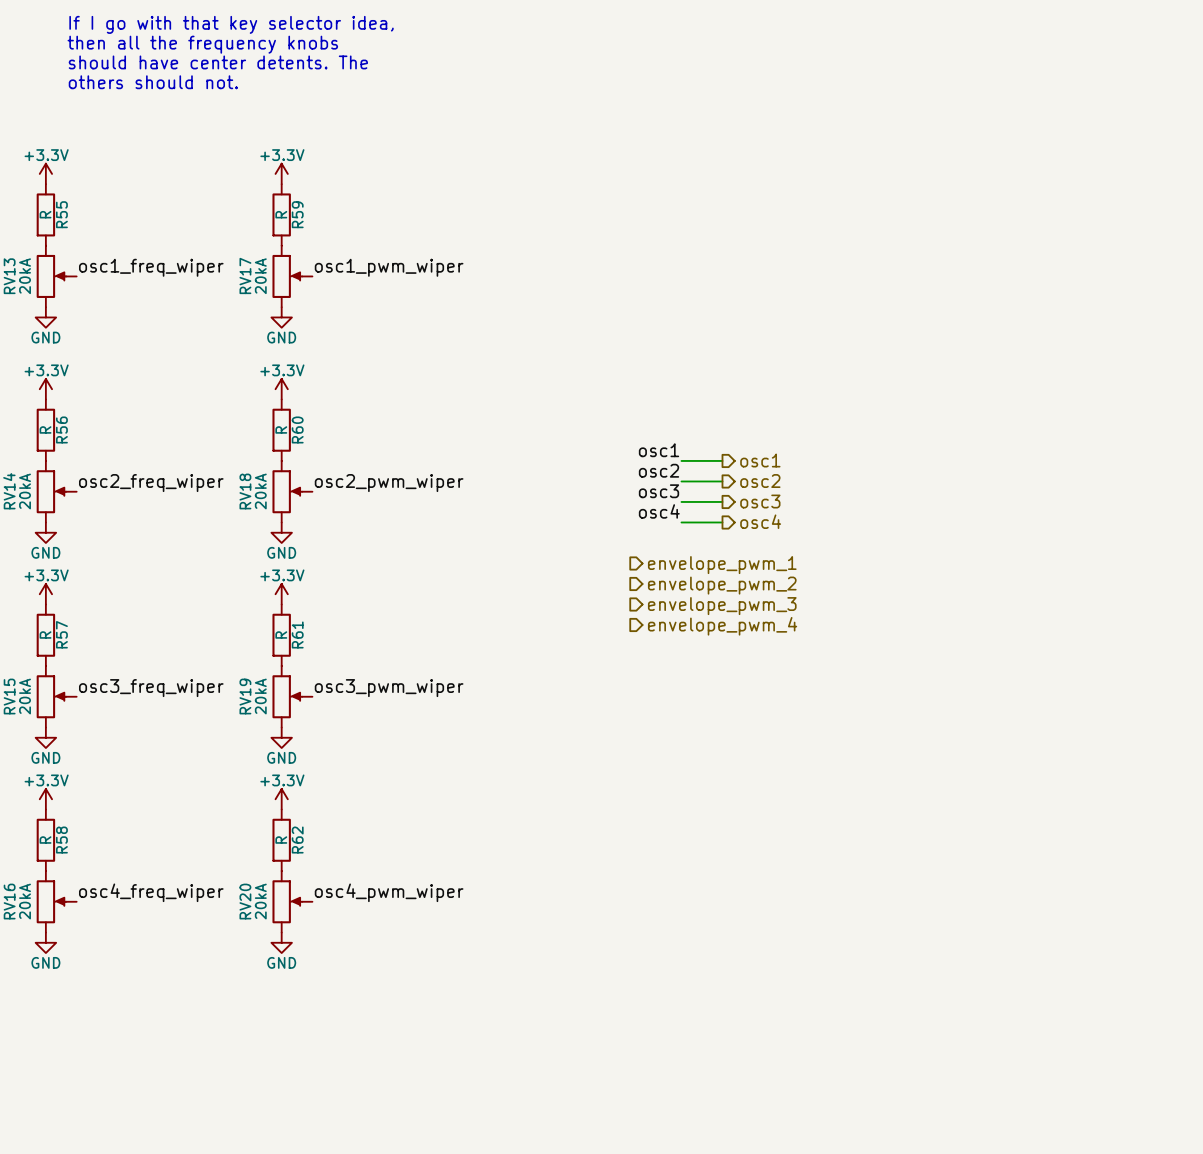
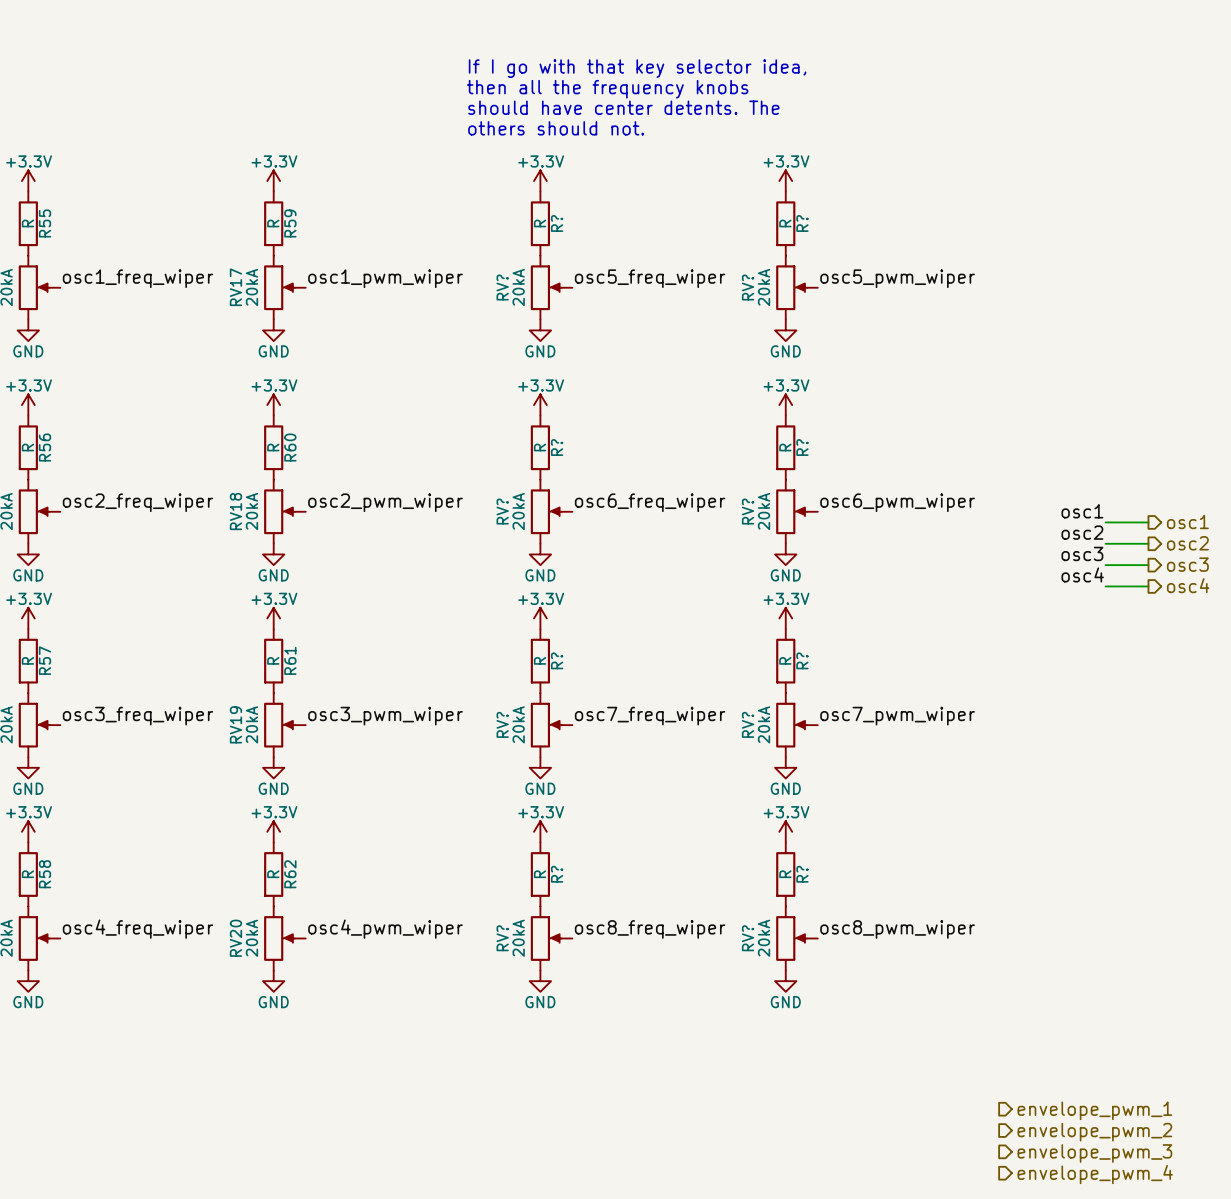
text: If I go with that key selector idea, (231, 24) -> none
text: then all the frequency knobs (202, 44) -> none
text: should have center detents. The (218, 62) -> none
text: none -> If I go with that key selector idea, (637, 68)
text: others should not. (153, 82) -> none
text: none -> then all the frequency knobs (607, 89)
text: none -> should have center detents. The (623, 107)
text: none -> others should not. (556, 128)
power symbol: none -> +3.3V (540, 181)
power symbol: none -> +3.3V (785, 181)
R?: none -> R (540, 223)
R?: none -> R (785, 223)
label: none -> osc5_freq_wiper (650, 278)
label: none -> osc5_pwm_wiper (897, 278)
RV?: none -> 20kA (551, 287)
RV?: none -> 20kA (796, 287)
power symbol: none -> GND (540, 330)
power symbol: none -> GND (785, 330)
power symbol: none -> +3.3V (540, 405)
power symbol: none -> +3.3V (785, 405)
R?: none -> R (540, 447)
R?: none -> R (785, 447)
label: osc1 (658, 450) -> none
wire: (681, 460) (722, 460) -> none
hierarchical label: osc1 (760, 460) -> none
label: osc2 (658, 470) -> none
wire: (681, 481) (722, 481) -> none
hierarchical label: osc2 (760, 481) -> none
label: none -> osc6_freq_wiper (650, 502)
label: none -> osc6_pwm_wiper (897, 502)
RV?: none -> 20kA (551, 511)
label: osc3 (658, 491) -> none
RV?: none -> 20kA (796, 511)
label: none -> osc1 (1082, 511)
wire: (681, 501) (722, 501) -> none
hierarchical label: osc3 (760, 501) -> none
wire: none -> (1105, 522) (1148, 522)
hierarchical label: none -> osc1 (1187, 521)
label: osc4 (659, 511) -> none
label: none -> osc2 (1082, 532)
hierarchical label: osc4 (760, 521) -> none
wire: (681, 522) (722, 522) -> none
wire: none -> (1105, 543) (1148, 543)
hierarchical label: none -> osc2 (1187, 543)
power symbol: none -> GND (540, 554)
power symbol: none -> GND (785, 554)
label: none -> osc3 (1082, 553)
wire: none -> (1105, 565) (1148, 565)
hierarchical label: none -> osc3 (1187, 564)
label: none -> osc4 (1082, 574)
hierarchical label: none -> osc4 (1188, 585)
wire: none -> (1105, 586) (1148, 586)
hierarchical label: envelope_pwm_1 (722, 565) -> none
hierarchical label: envelope_pwm_2 (722, 585) -> none
power symbol: none -> +3.3V (540, 618)
power symbol: none -> +3.3V (785, 618)
hierarchical label: envelope_pwm_3 (722, 606) -> none
hierarchical label: envelope_pwm_4 (722, 626) -> none
R?: none -> R (540, 661)
R?: none -> R (785, 661)
label: none -> osc7_freq_wiper (650, 716)
label: none -> osc7_pwm_wiper (897, 716)
RV?: none -> 20kA (551, 725)
RV?: none -> 20kA (796, 725)
power symbol: none -> GND (540, 767)
power symbol: none -> GND (785, 767)
power symbol: none -> +3.3V (540, 831)
power symbol: none -> +3.3V (785, 831)
R?: none -> R (540, 874)
R?: none -> R (785, 874)
label: none -> osc8_freq_wiper (650, 929)
label: none -> osc8_pwm_wiper (897, 929)
RV?: none -> 20kA (551, 938)
RV?: none -> 20kA (796, 938)
power symbol: none -> GND (540, 981)
power symbol: none -> GND (785, 981)
hierarchical label: none -> envelope_pwm_1 (1094, 1110)
hierarchical label: none -> envelope_pwm_2 (1094, 1132)
hierarchical label: none -> envelope_pwm_3 (1094, 1153)
hierarchical label: none -> envelope_pwm_4 (1095, 1174)

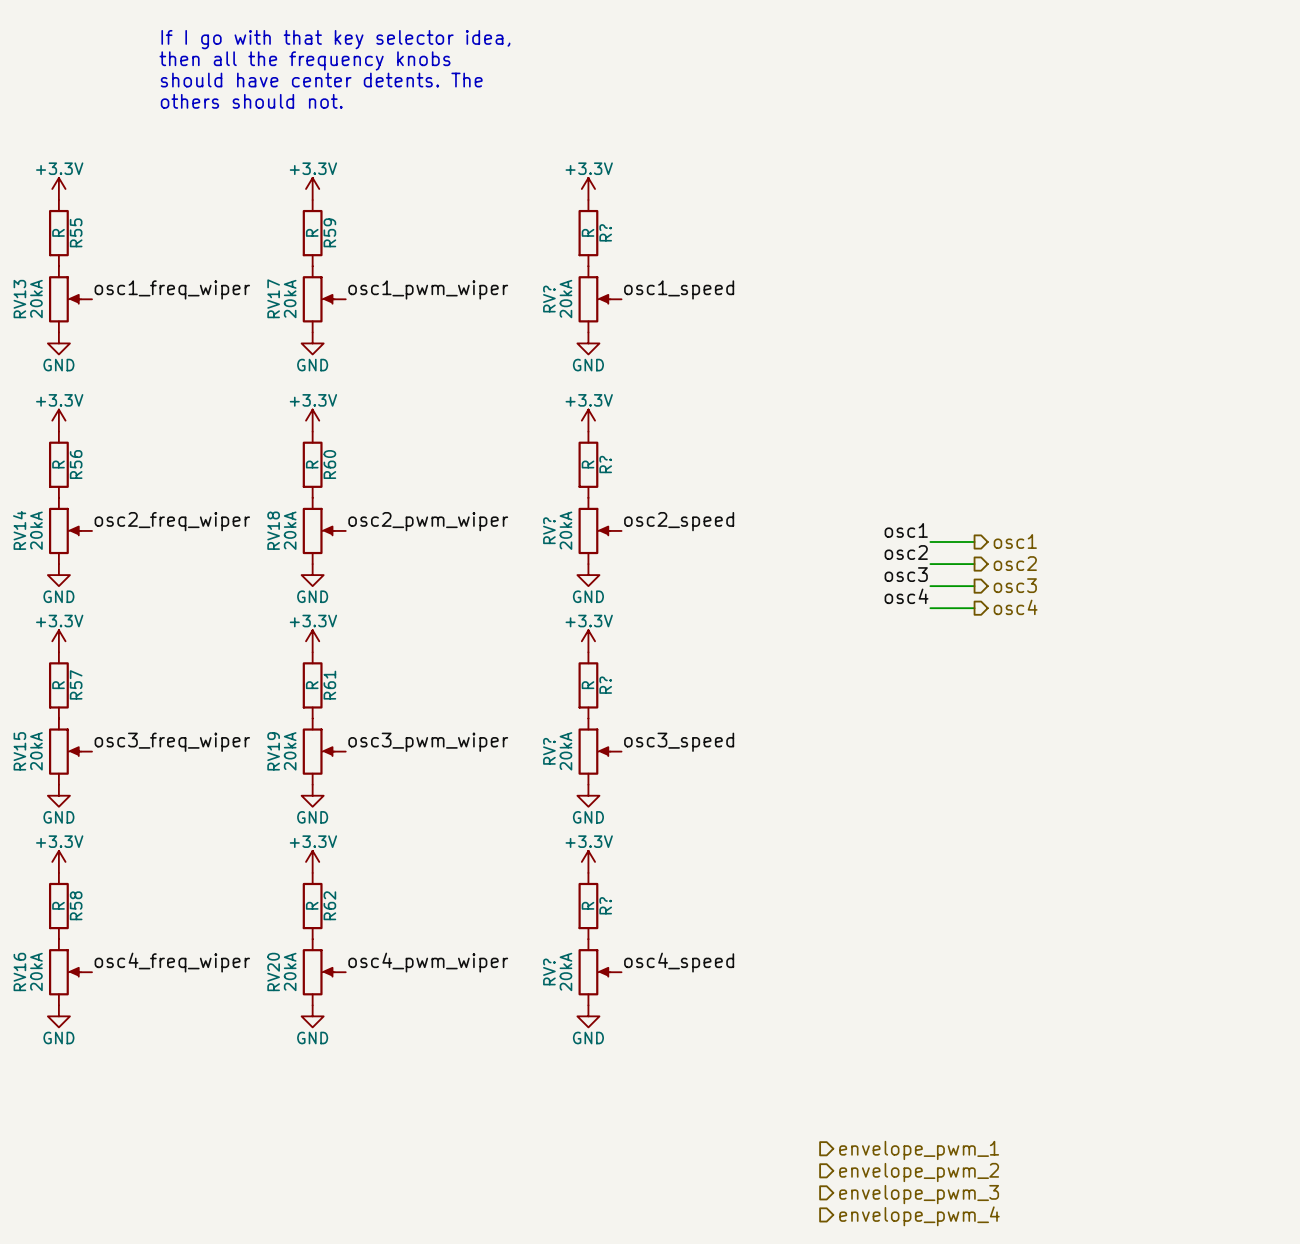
text: none -> If I go with that key selector idea, (335, 39)
text: none -> then all the frequency knobs (305, 60)
text: If I go with that key selector idea, (637, 68) -> none
text: none -> should have center detents. The (321, 80)
text: then all the frequency knobs (607, 89) -> none
text: none -> others should not. (251, 101)
text: should have center detents. The (623, 107) -> none
text: others should not. (556, 128) -> none
power symbol: +3.3V (785, 181) -> none
R?: R (785, 223) -> none
label: osc5_freq_wiper (650, 278) -> osc1_speed (679, 289)
label: osc5_pwm_wiper (897, 278) -> none
RV?: 20kA (796, 287) -> none
power symbol: GND (785, 330) -> none
power symbol: +3.3V (785, 405) -> none
R?: R (785, 447) -> none
label: osc6_freq_wiper (650, 502) -> osc2_speed (679, 521)
label: osc6_pwm_wiper (897, 502) -> none
RV?: 20kA (796, 511) -> none
label: none -> osc1 (906, 530)
label: osc1 (1082, 511) -> none
hierarchical label: none -> osc1 (1015, 541)
hierarchical label: osc1 (1187, 521) -> none
wire: none -> (930, 542) (974, 542)
wire: (1105, 522) (1148, 522) -> none
label: none -> osc2 (906, 552)
label: osc2 (1082, 532) -> none
wire: none -> (930, 564) (974, 564)
hierarchical label: none -> osc2 (1015, 563)
wire: (1105, 543) (1148, 543) -> none
hierarchical label: osc2 (1187, 543) -> none
label: none -> osc3 (906, 574)
label: osc3 (1082, 553) -> none
power symbol: GND (785, 554) -> none
hierarchical label: none -> osc3 (1015, 585)
hierarchical label: osc3 (1187, 564) -> none
wire: none -> (930, 586) (974, 586)
wire: (1105, 565) (1148, 565) -> none
label: none -> osc4 (906, 596)
label: osc4 (1082, 574) -> none
hierarchical label: none -> osc4 (1015, 607)
hierarchical label: osc4 (1188, 585) -> none
wire: none -> (930, 608) (974, 608)
wire: (1105, 586) (1148, 586) -> none
power symbol: +3.3V (785, 618) -> none
R?: R (785, 661) -> none
label: osc7_freq_wiper (650, 716) -> osc3_speed (679, 742)
label: osc7_pwm_wiper (897, 716) -> none
RV?: 20kA (796, 725) -> none
power symbol: GND (785, 767) -> none
power symbol: +3.3V (785, 831) -> none
R?: R (785, 874) -> none
label: osc8_freq_wiper (650, 929) -> osc4_speed (679, 962)
label: osc8_pwm_wiper (897, 929) -> none
RV?: 20kA (796, 938) -> none
power symbol: GND (785, 981) -> none
hierarchical label: none -> envelope_pwm_1 (919, 1150)
hierarchical label: envelope_pwm_1 (1094, 1110) -> none
hierarchical label: none -> envelope_pwm_2 (919, 1172)
hierarchical label: envelope_pwm_2 (1094, 1132) -> none
hierarchical label: none -> envelope_pwm_3 (919, 1194)
hierarchical label: envelope_pwm_3 (1094, 1153) -> none
hierarchical label: none -> envelope_pwm_4 (919, 1216)
hierarchical label: envelope_pwm_4 (1095, 1174) -> none

